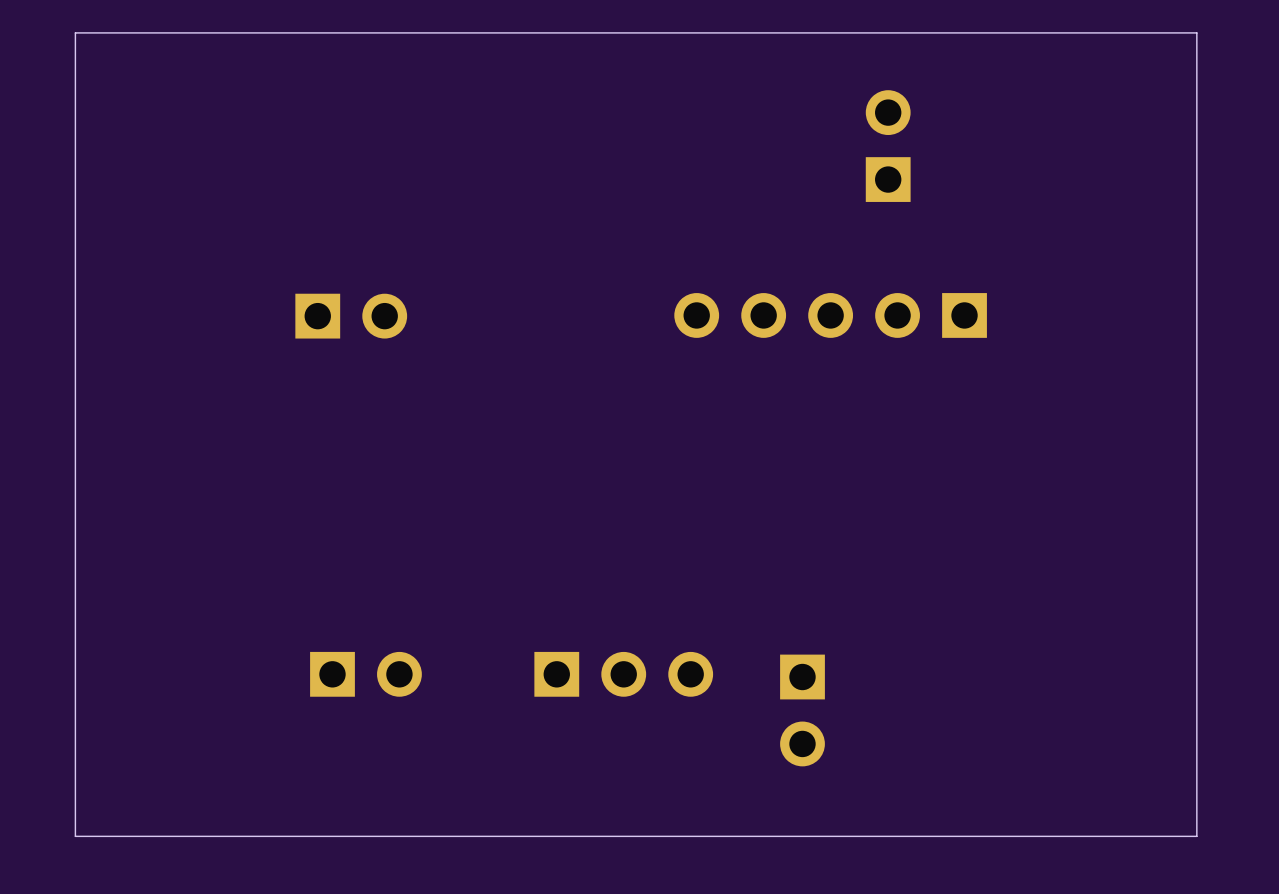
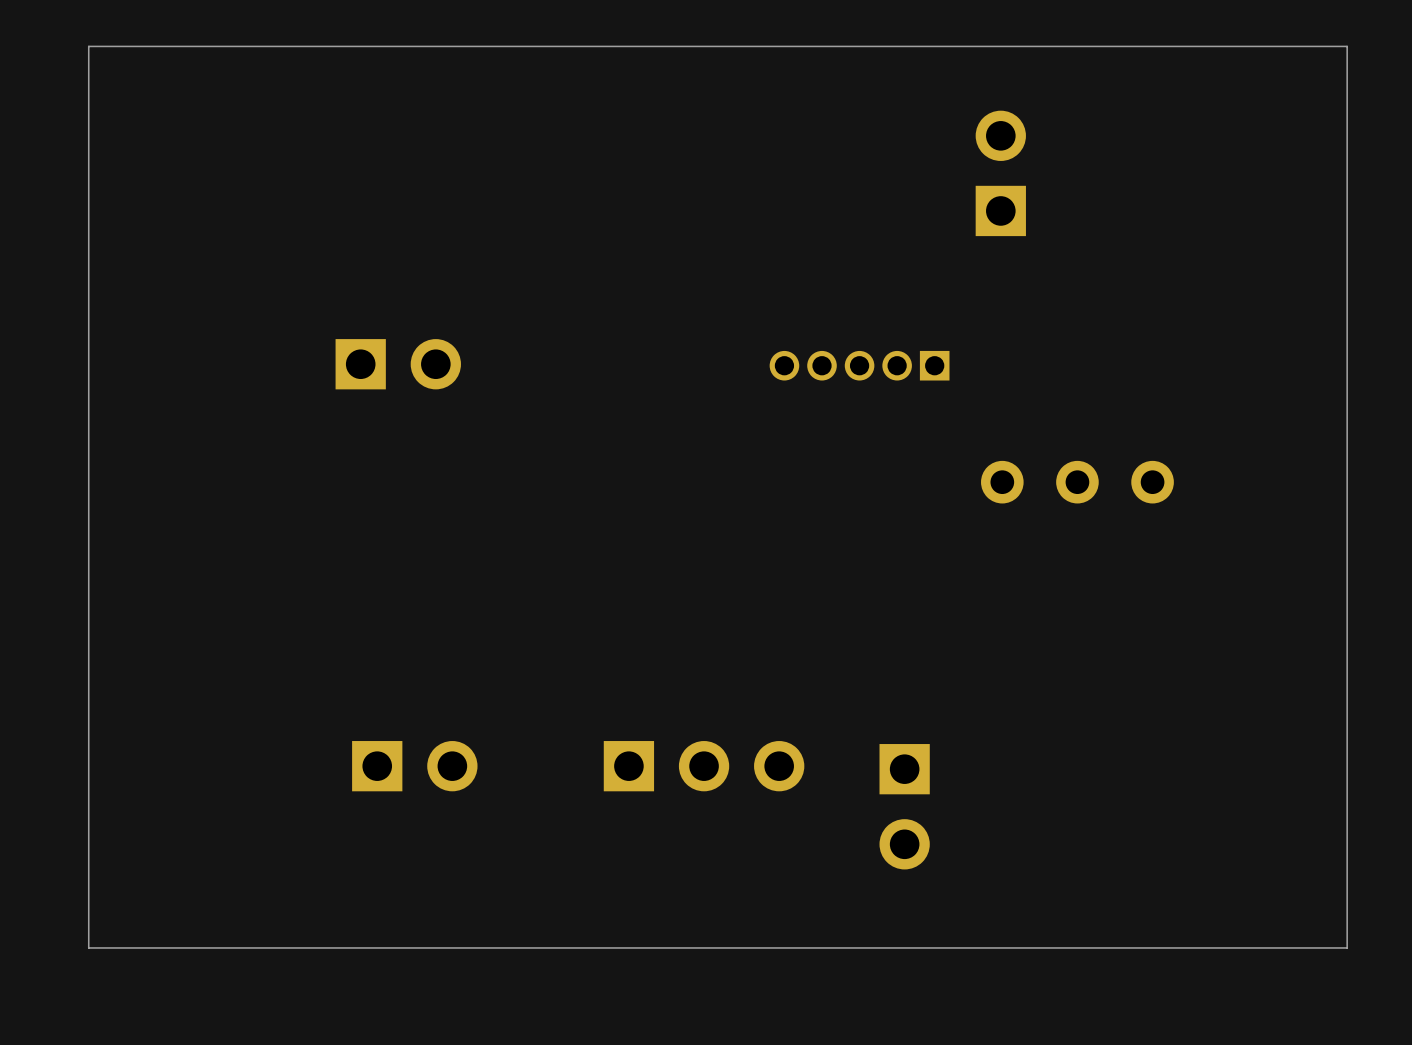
part: (830, 315) -> none
part: none -> (859, 365)
part: none -> (1077, 482)

